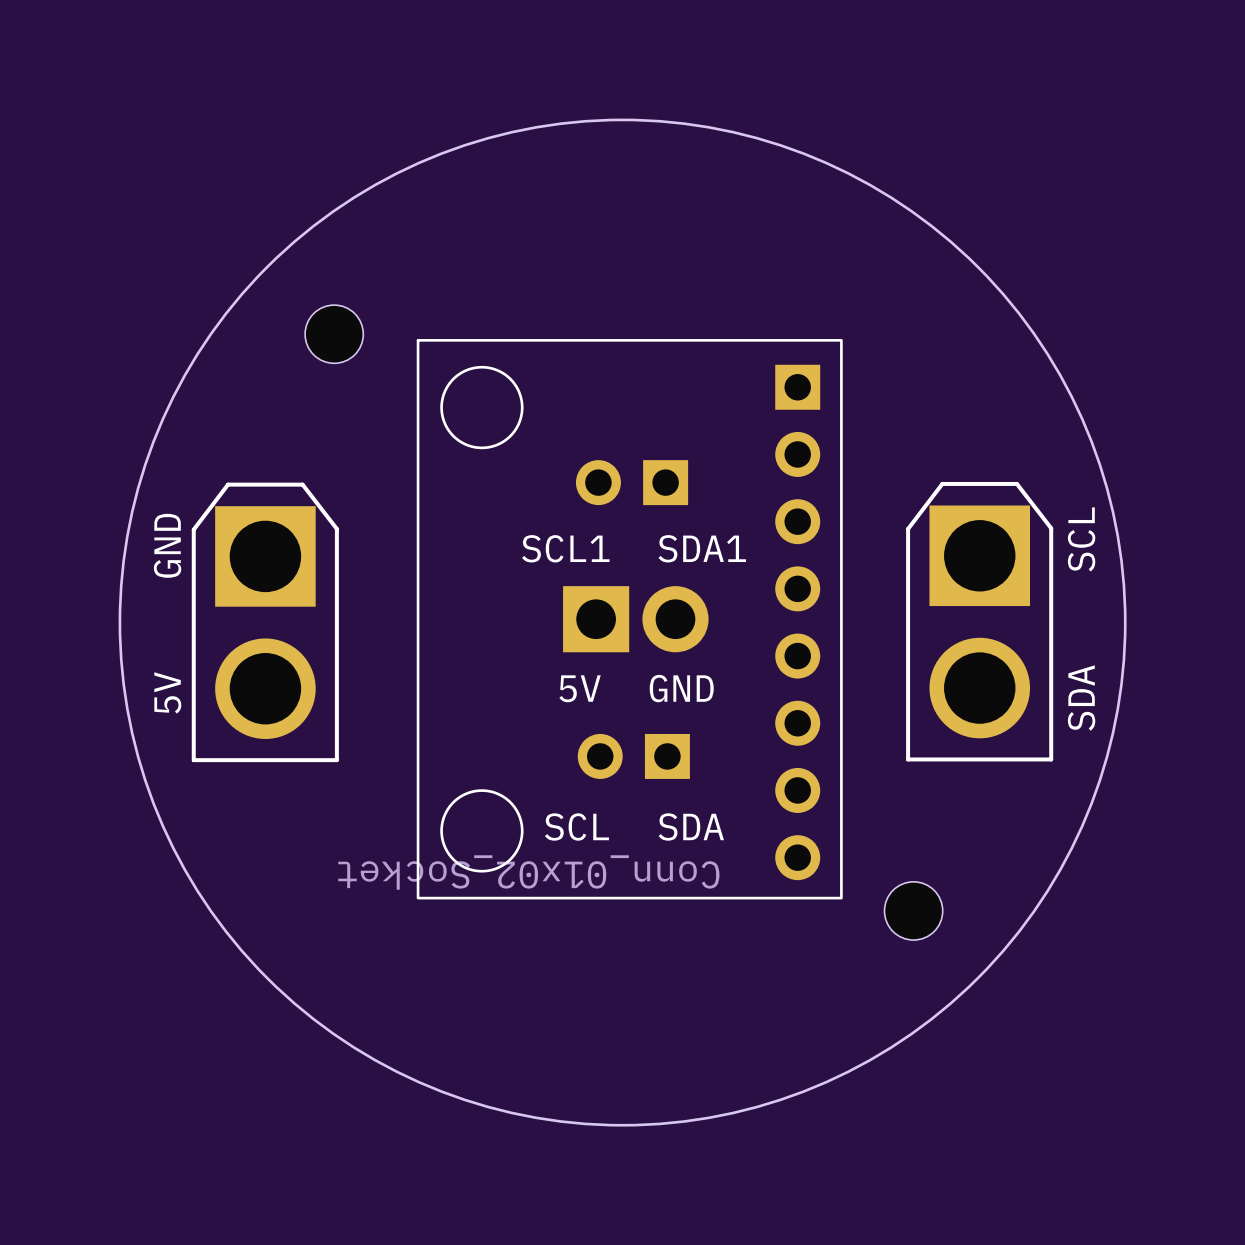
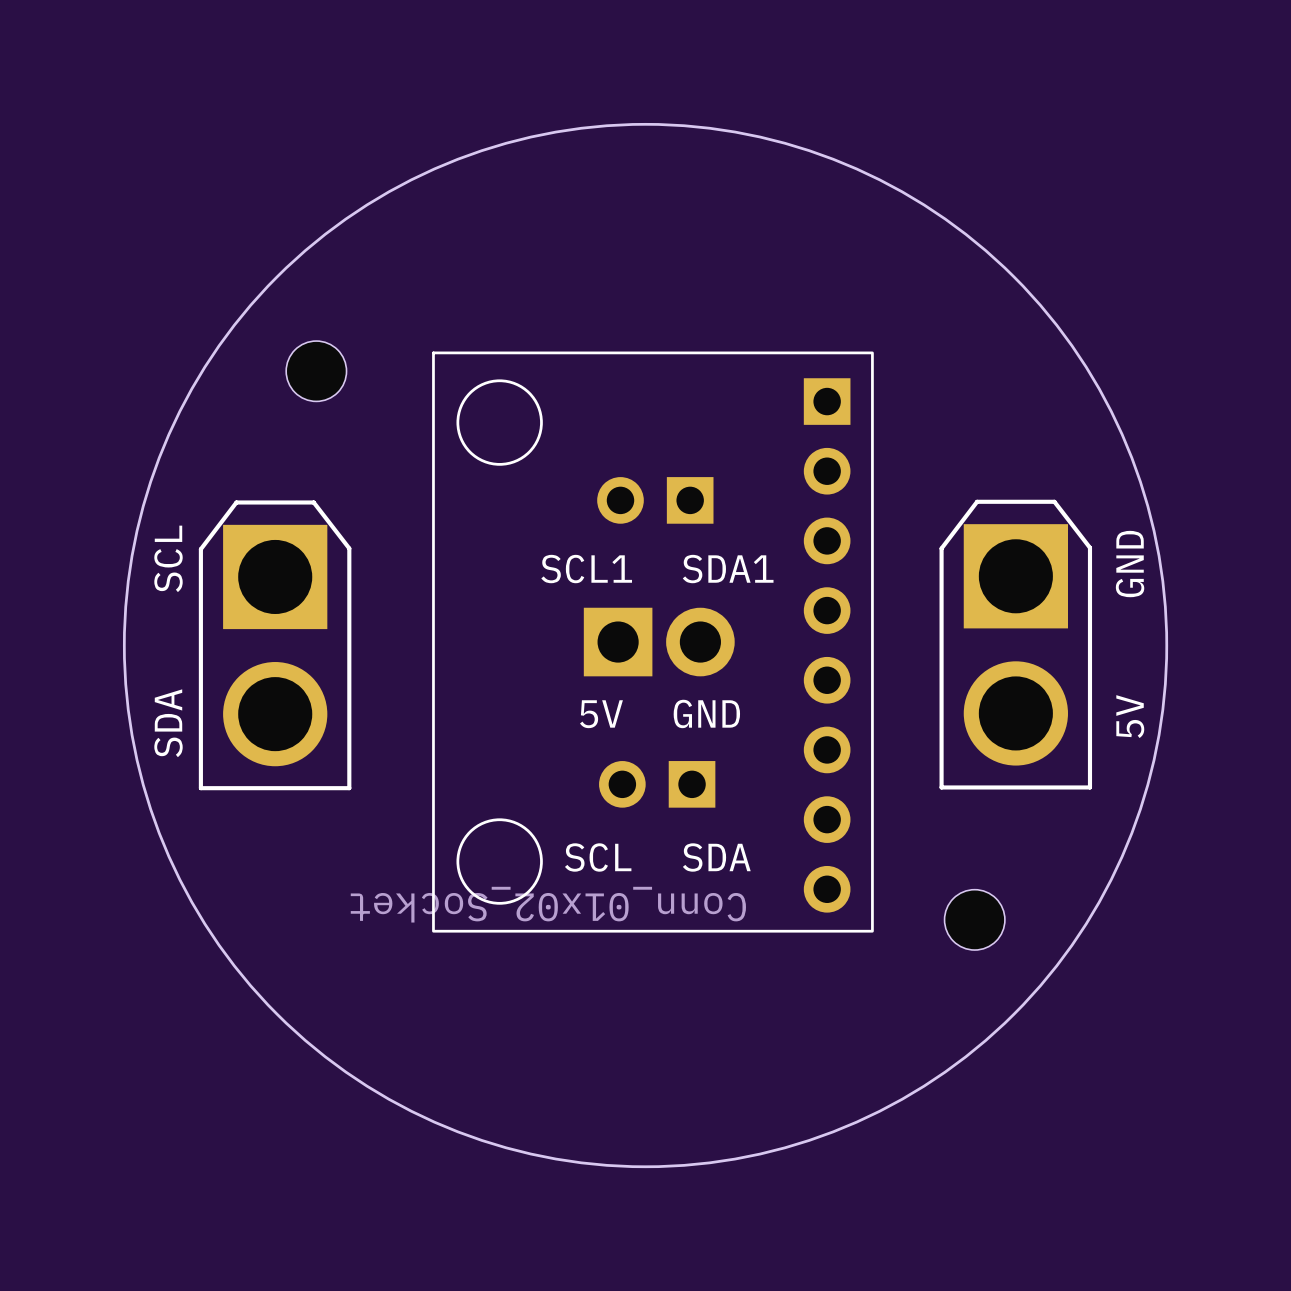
part position: (334, 334) -> (316, 371)
text: 5V GND (167, 613) -> SDA SCL (168, 641)
text: SDA SCL (1081, 619) -> 5V GND (1130, 634)
part position: (913, 910) -> (974, 919)

